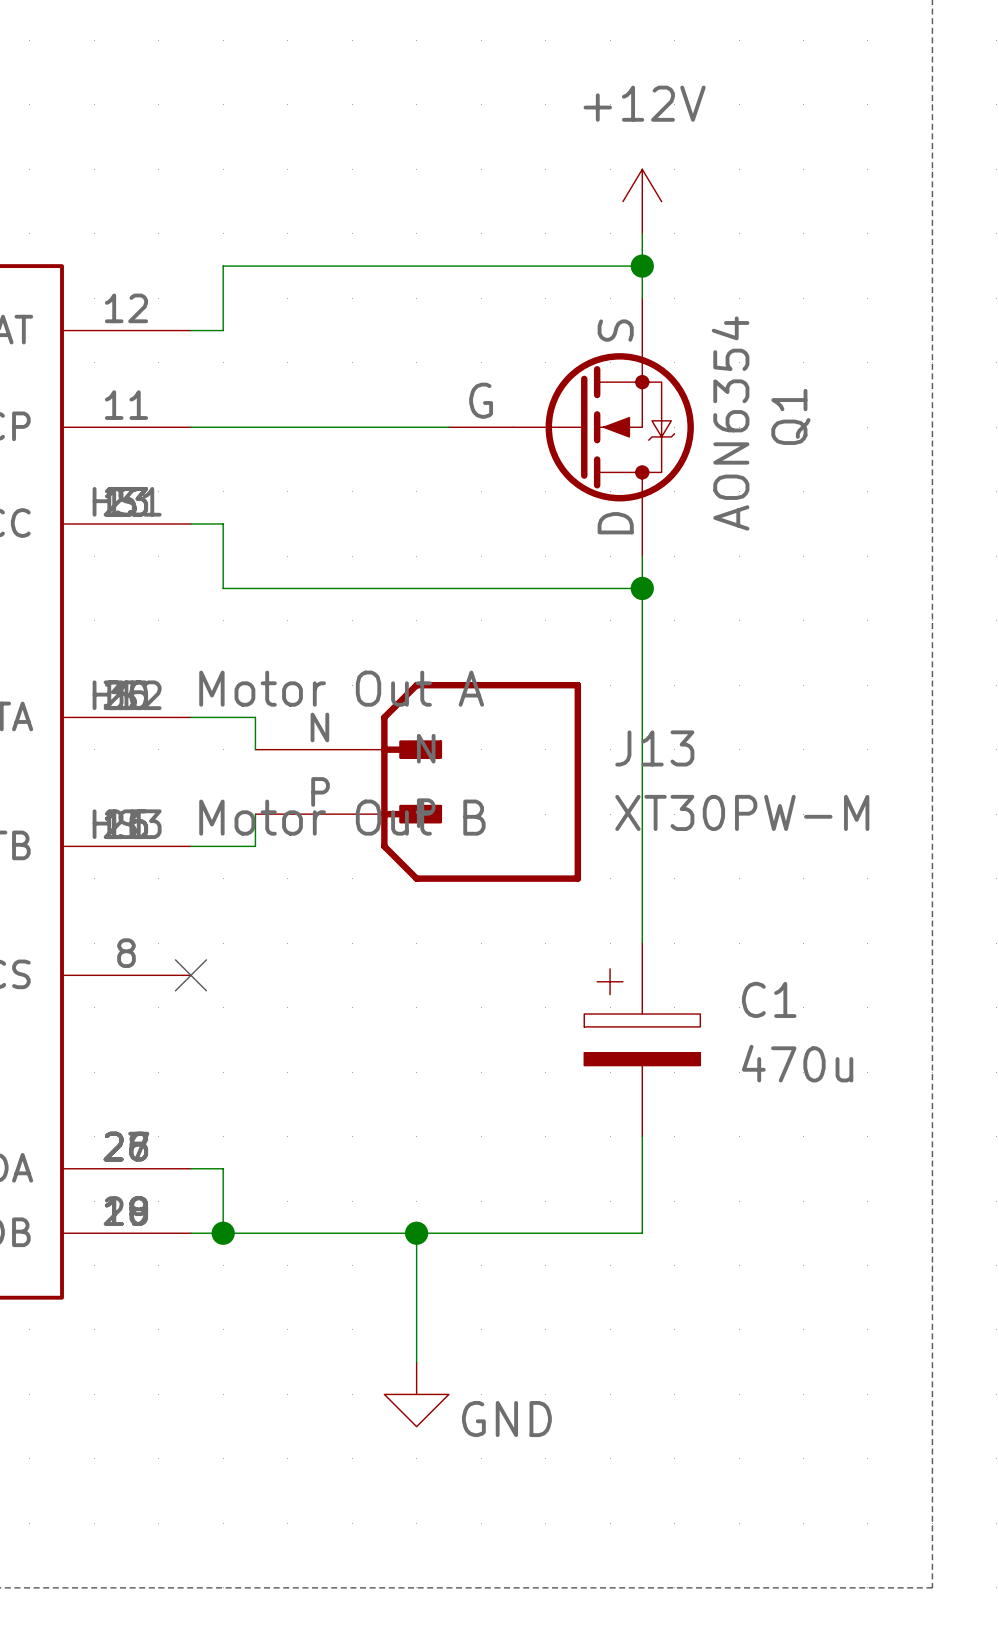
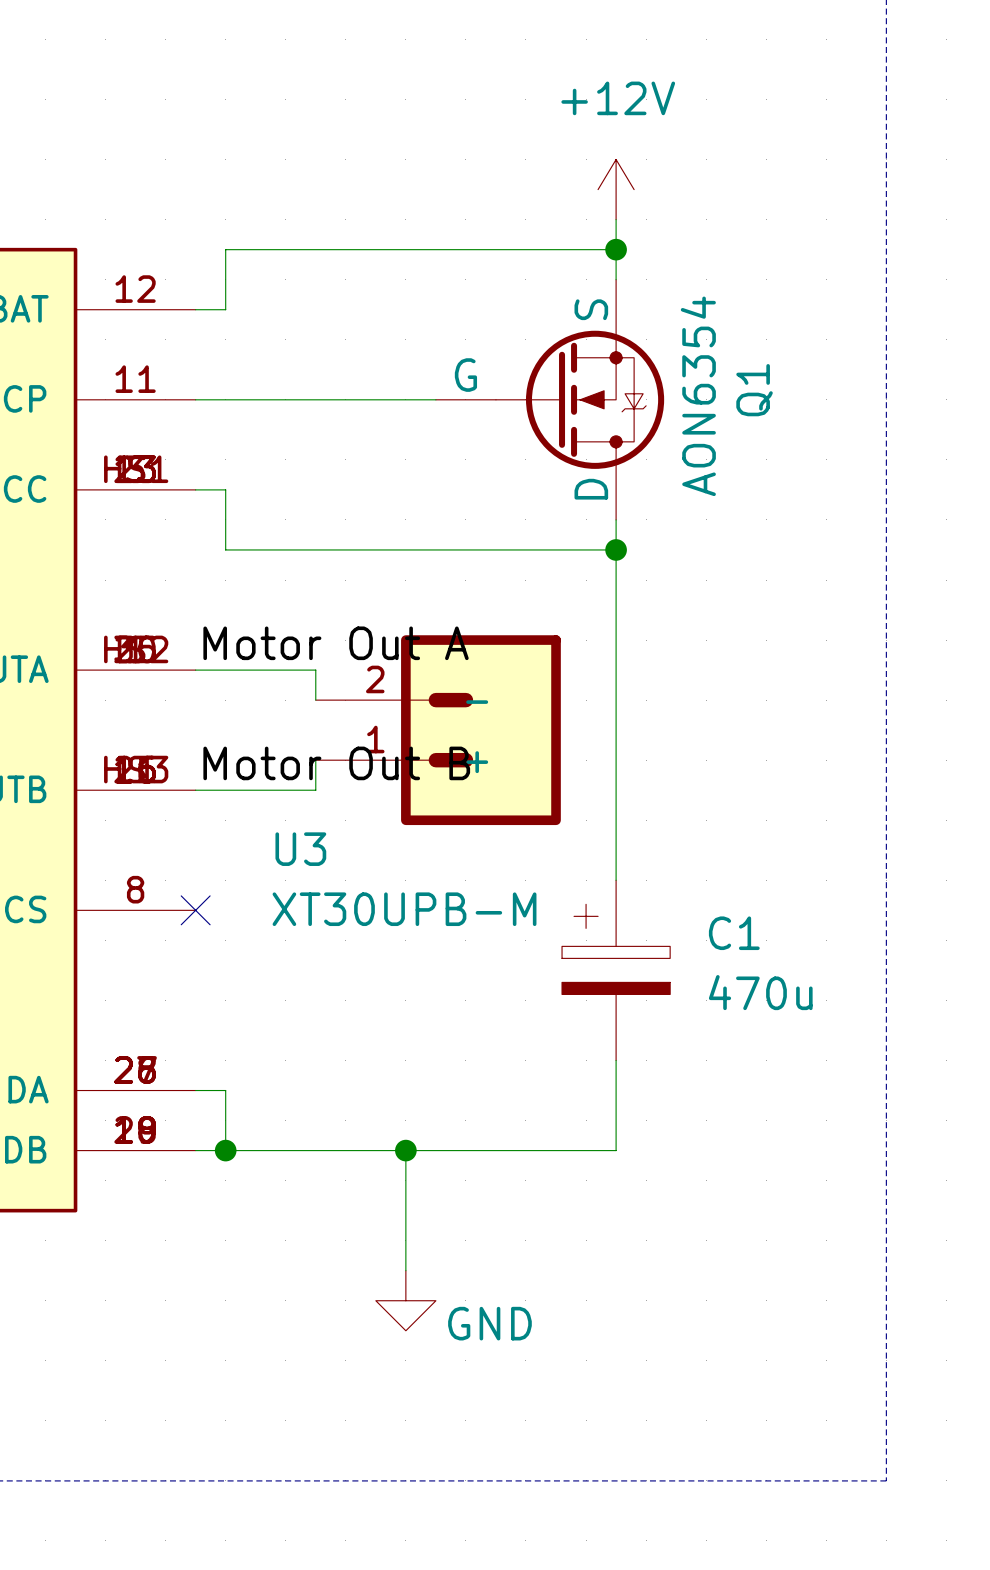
wire: (255, 717) (255, 749) -> (255, 670) (315, 670) (315, 700)
J13: XT30PW-M (418, 781) -> none
U3: none -> XT30UPB-M (438, 730)
wire: (255, 814) (255, 846) -> (315, 760) (315, 790) (255, 790)

